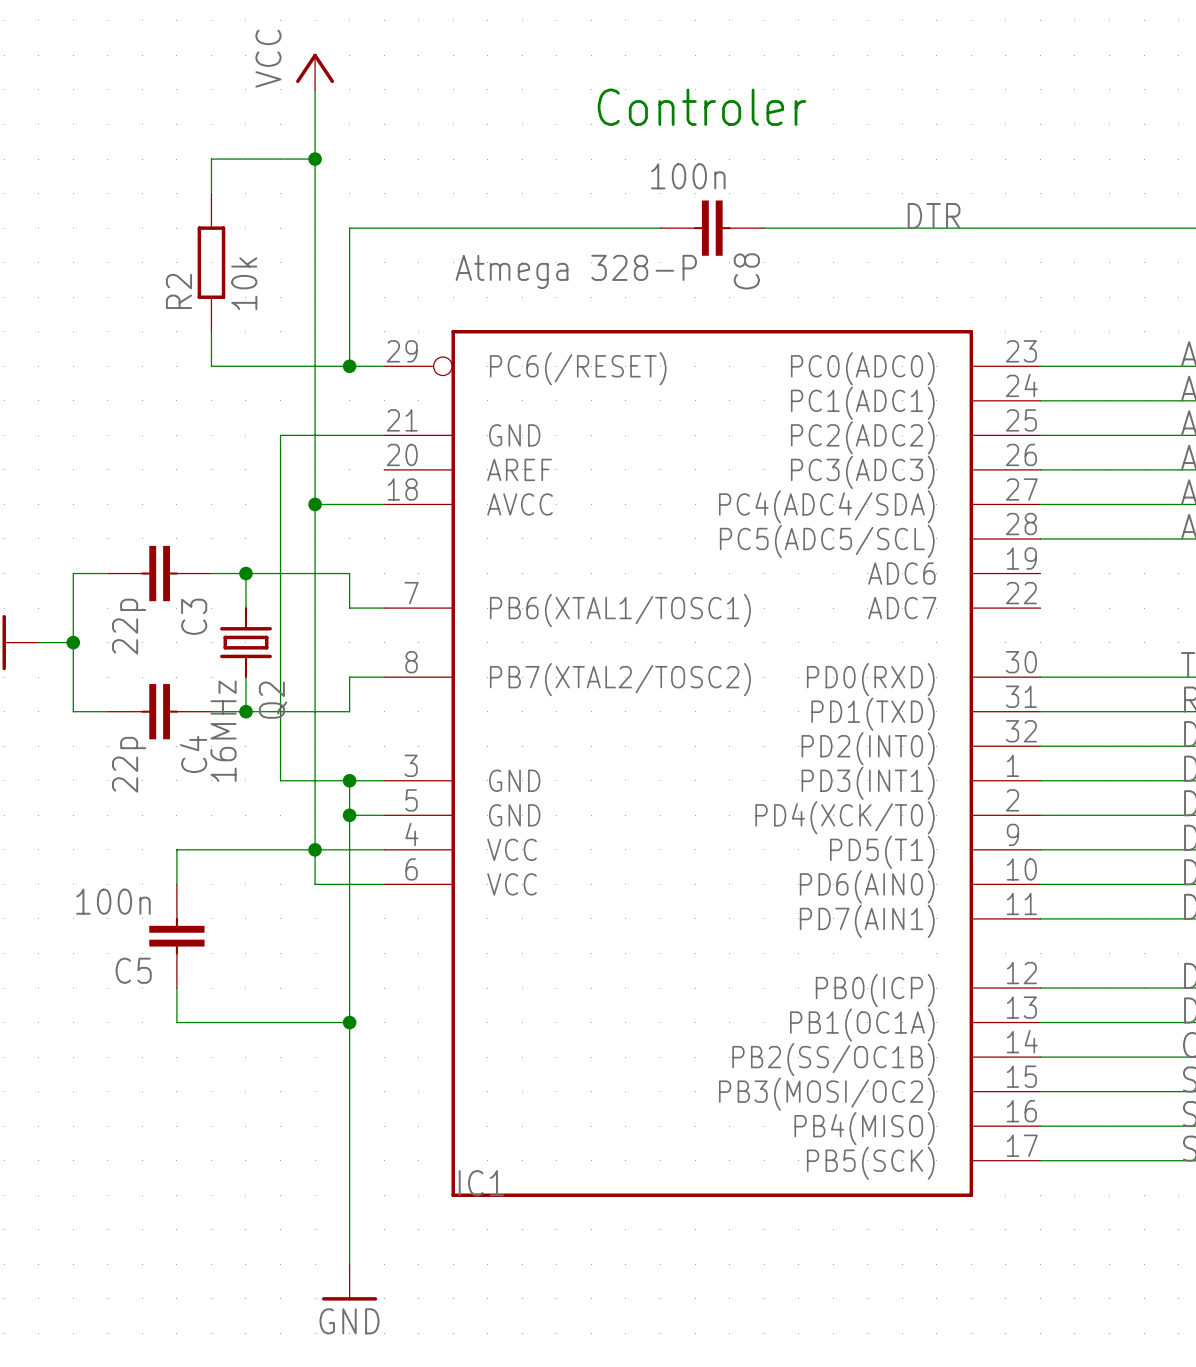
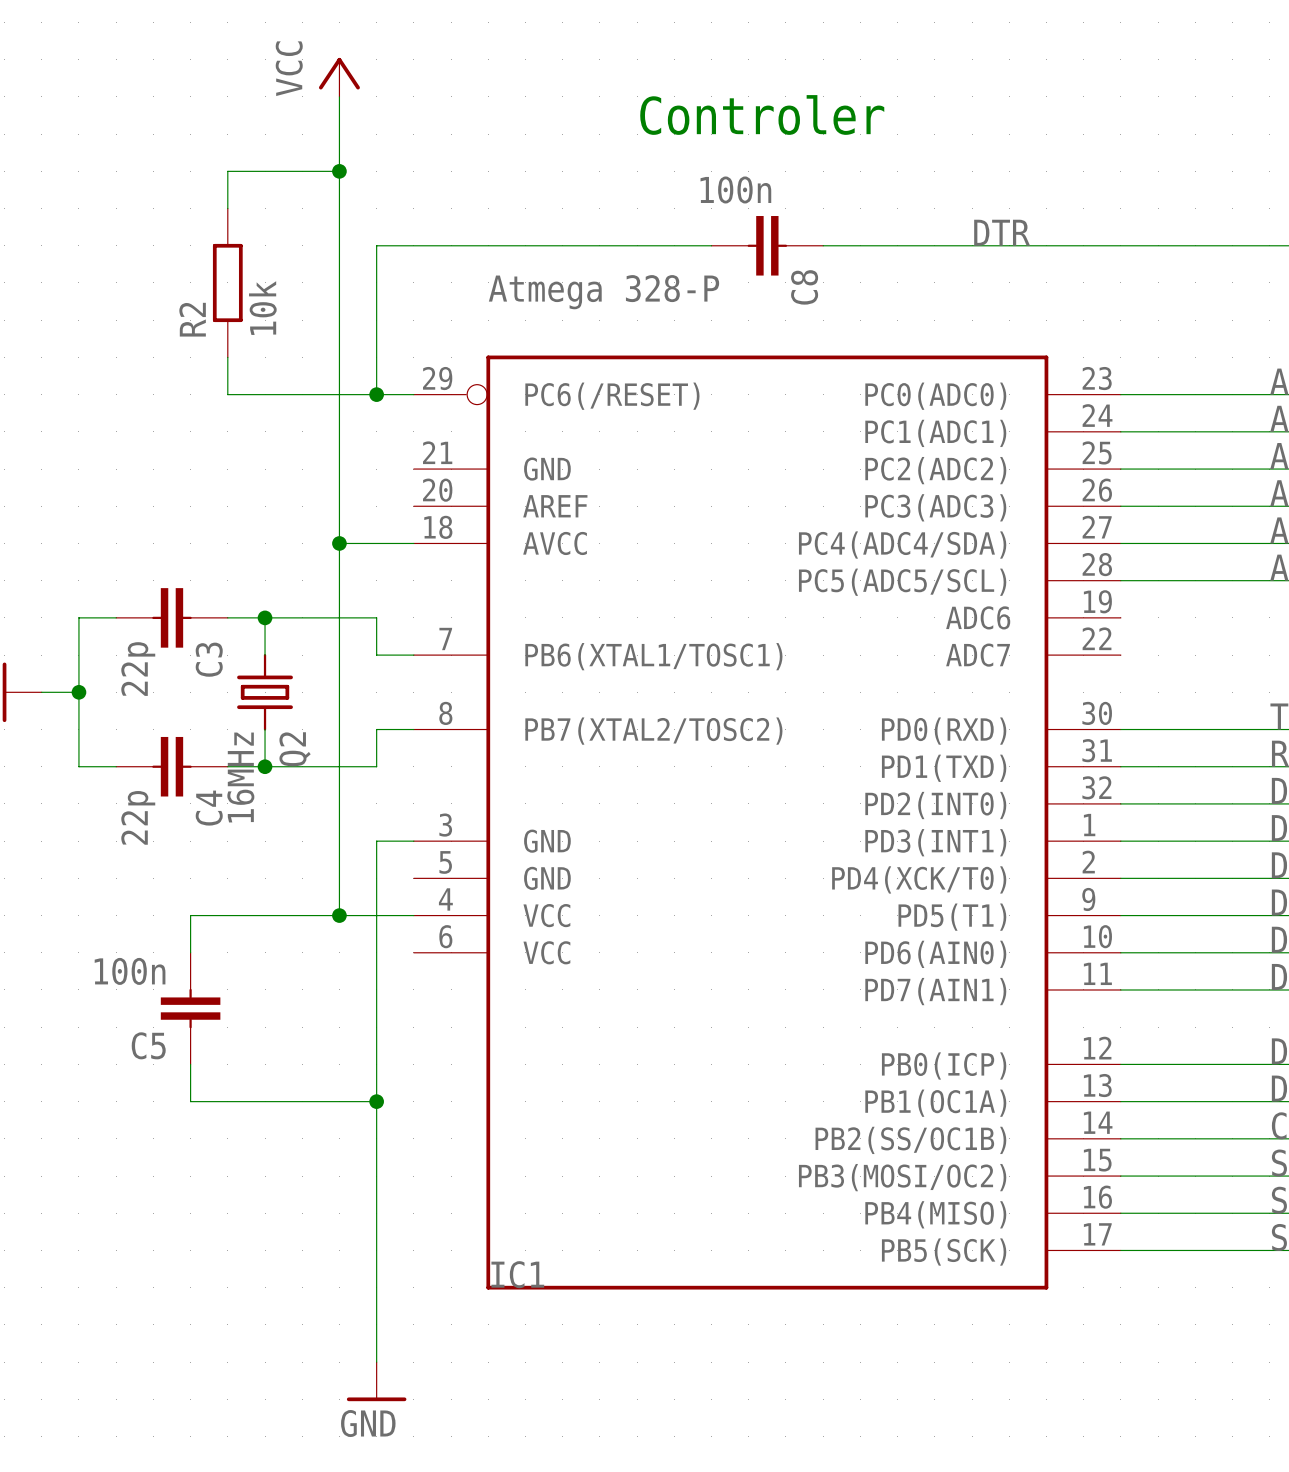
wire: (384, 435) (280, 435) (280, 780) (349, 780) -> none
junction: (349, 780) -> none
wire: (349, 815) (384, 815) -> none
junction: (349, 815) -> none
wire: (315, 849) (315, 884) (384, 884) -> none

